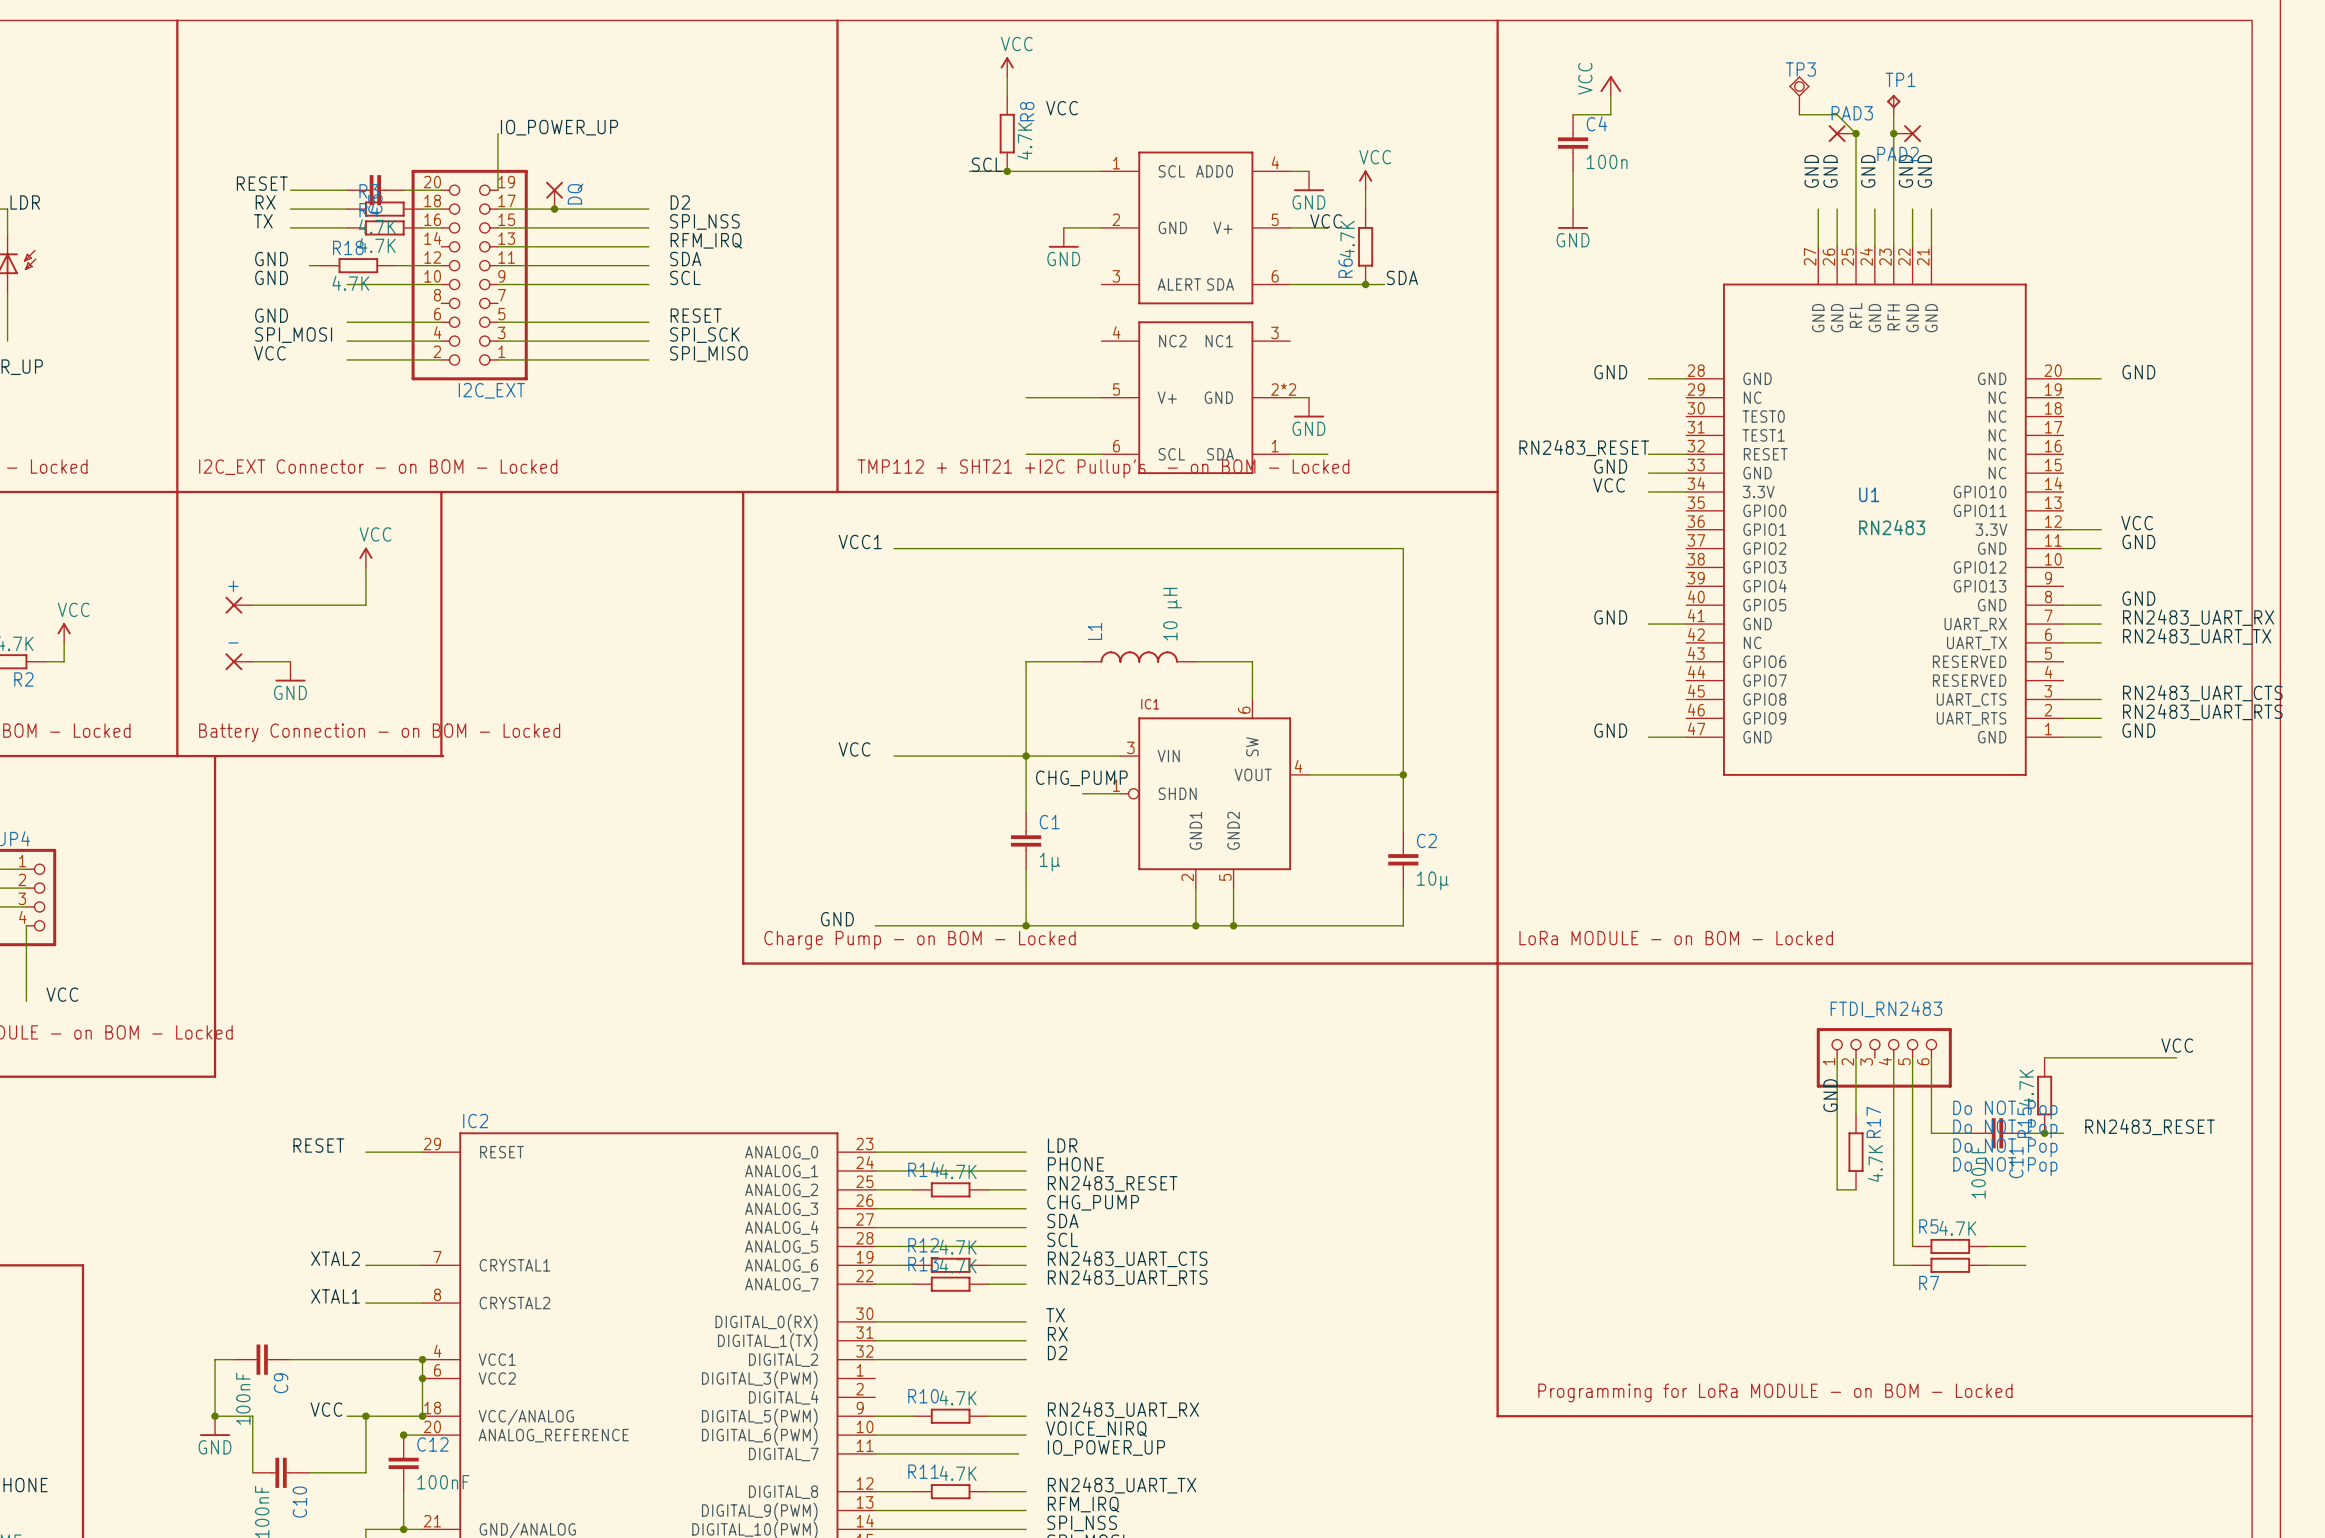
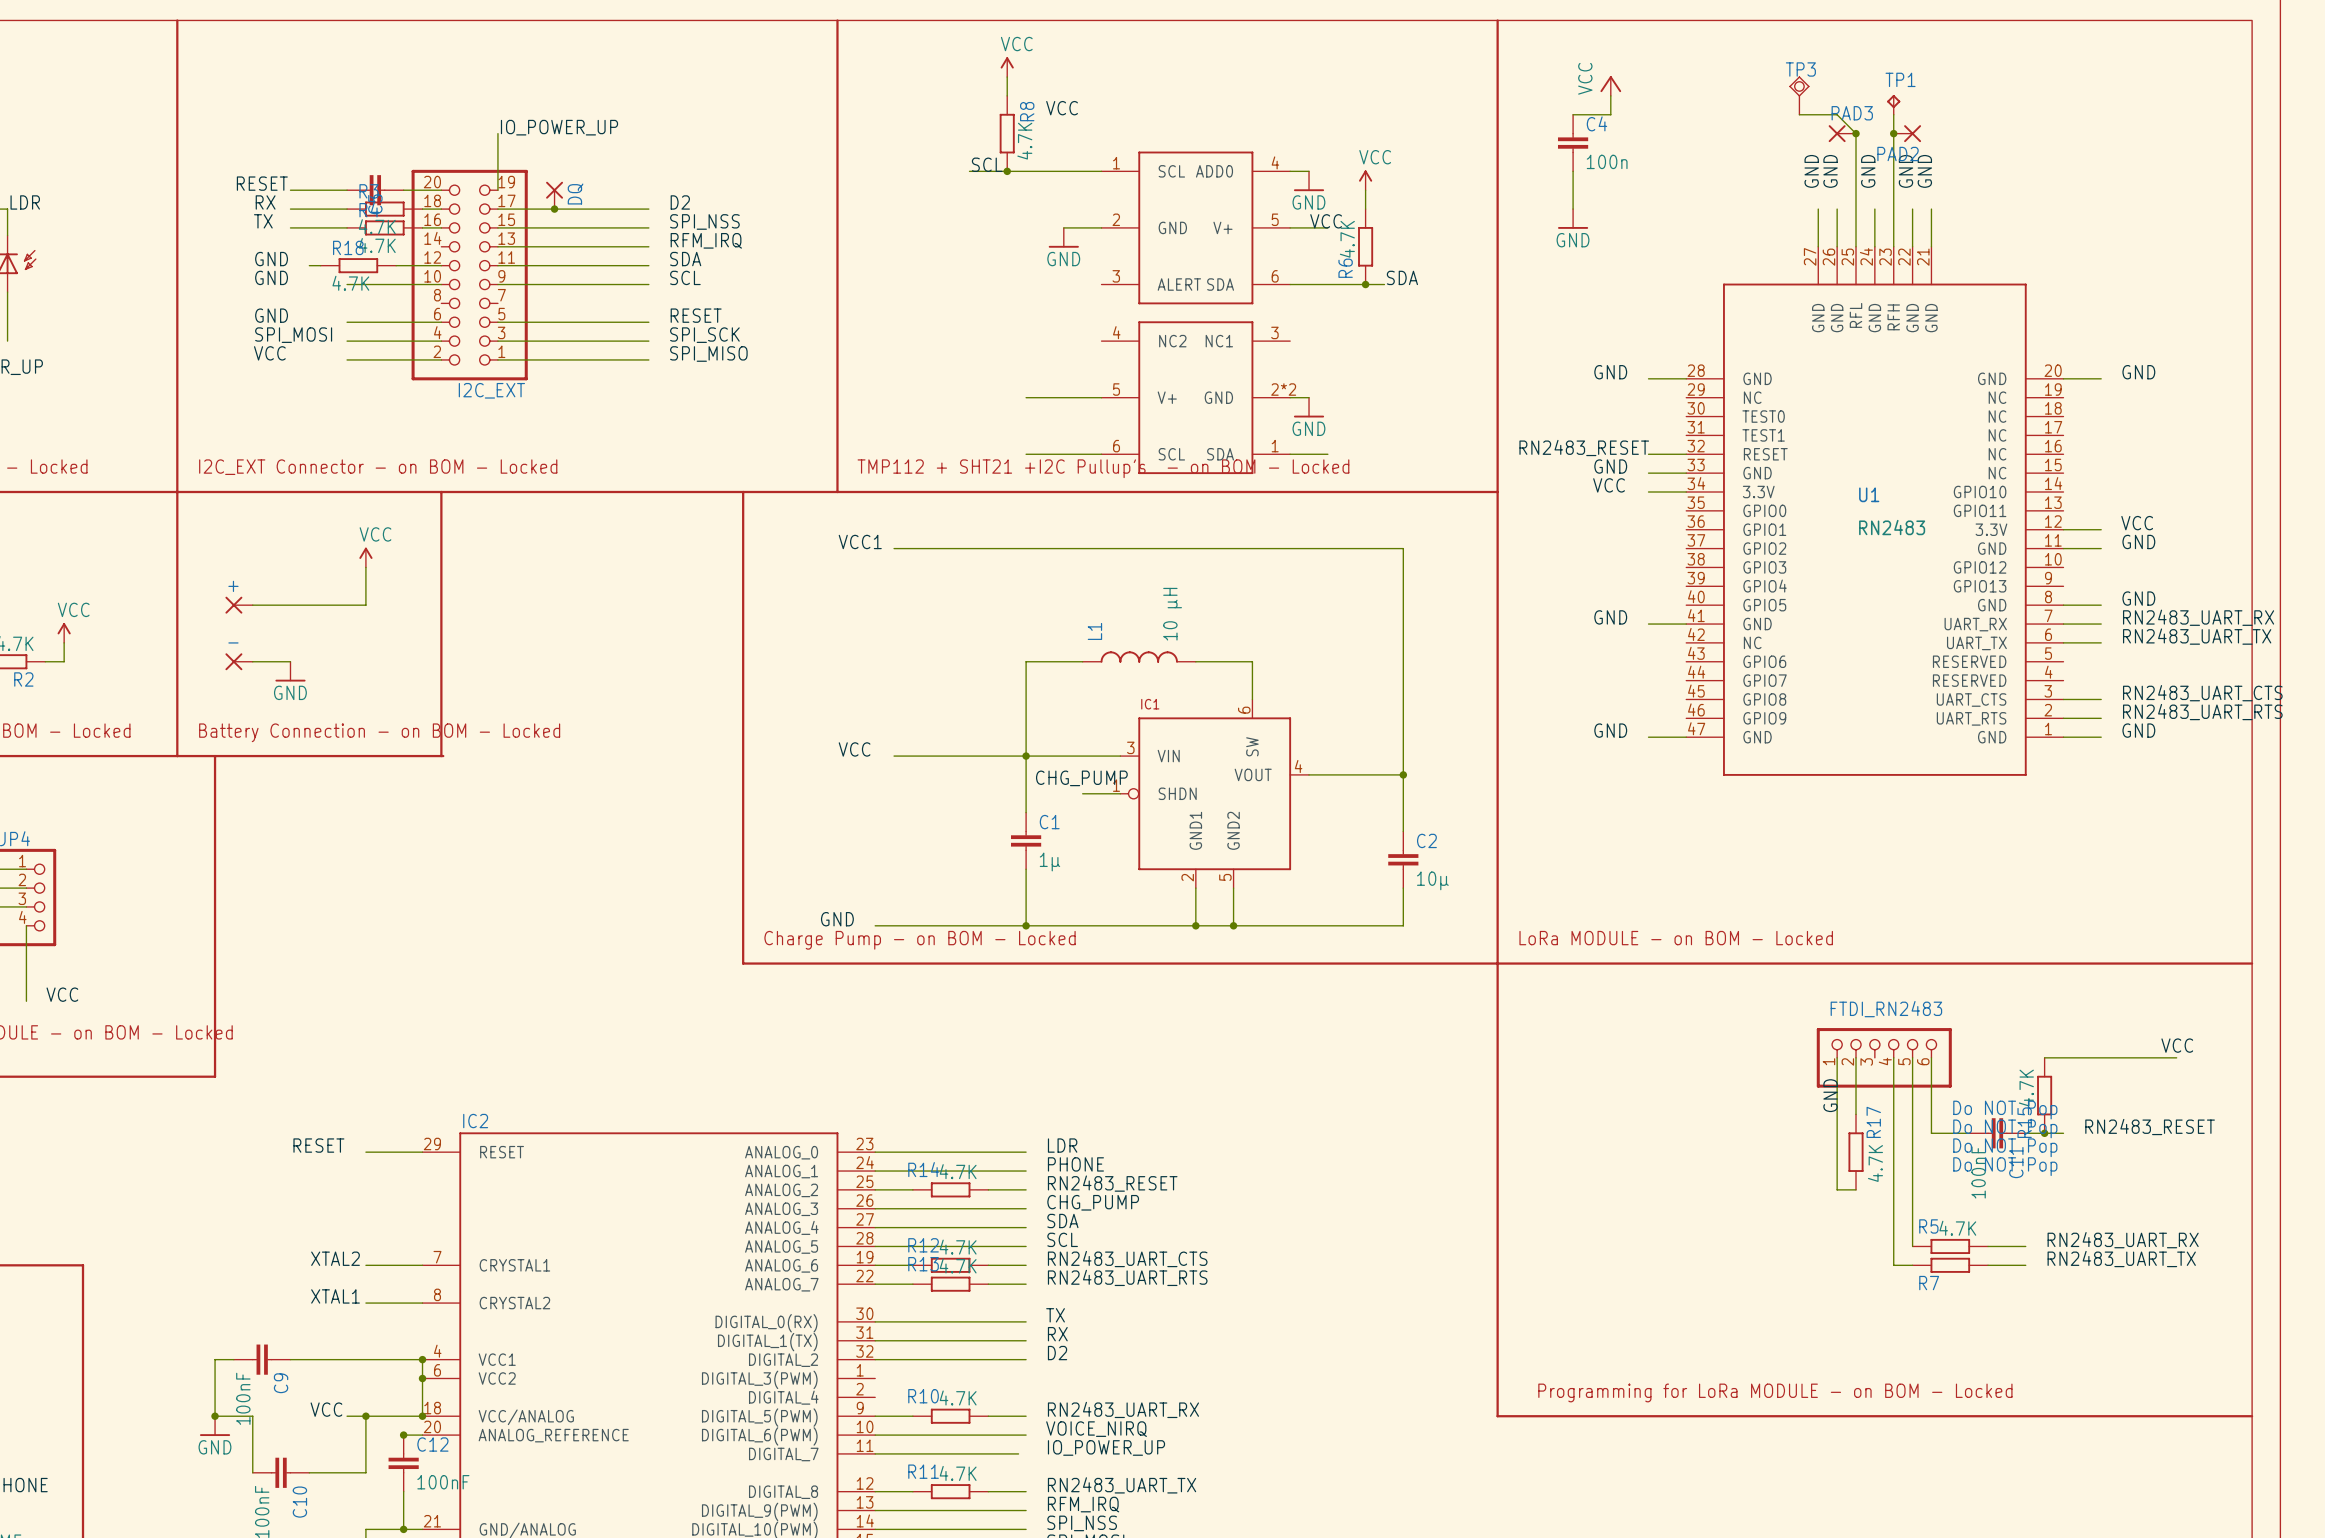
label: none -> RN2483_UART_RX (2123, 1240)
label: none -> RN2483_UART_TX (2121, 1259)

